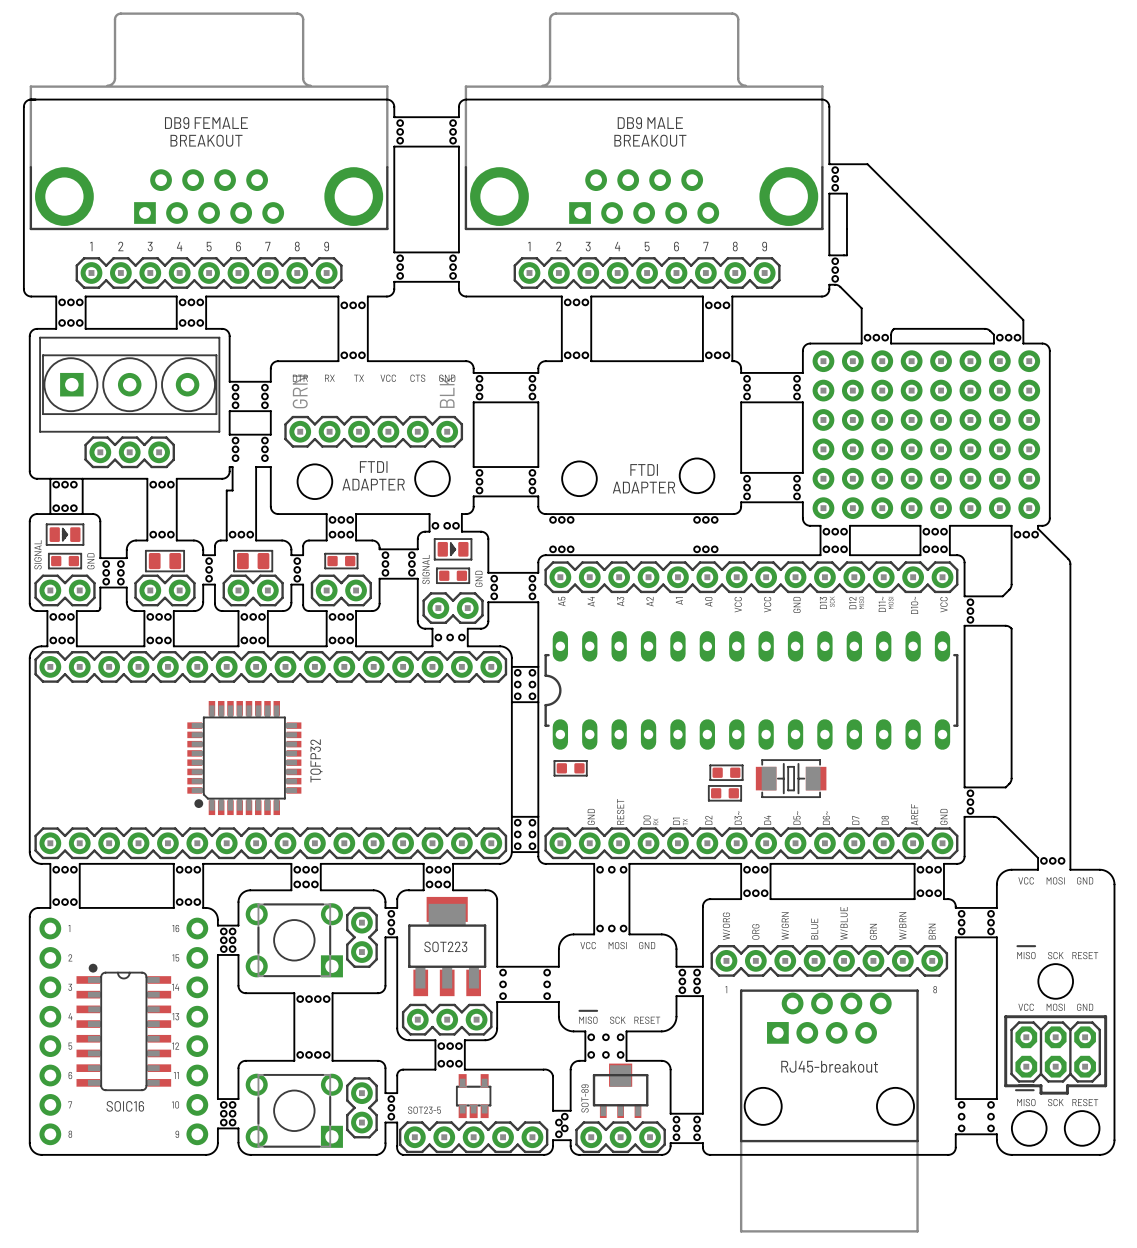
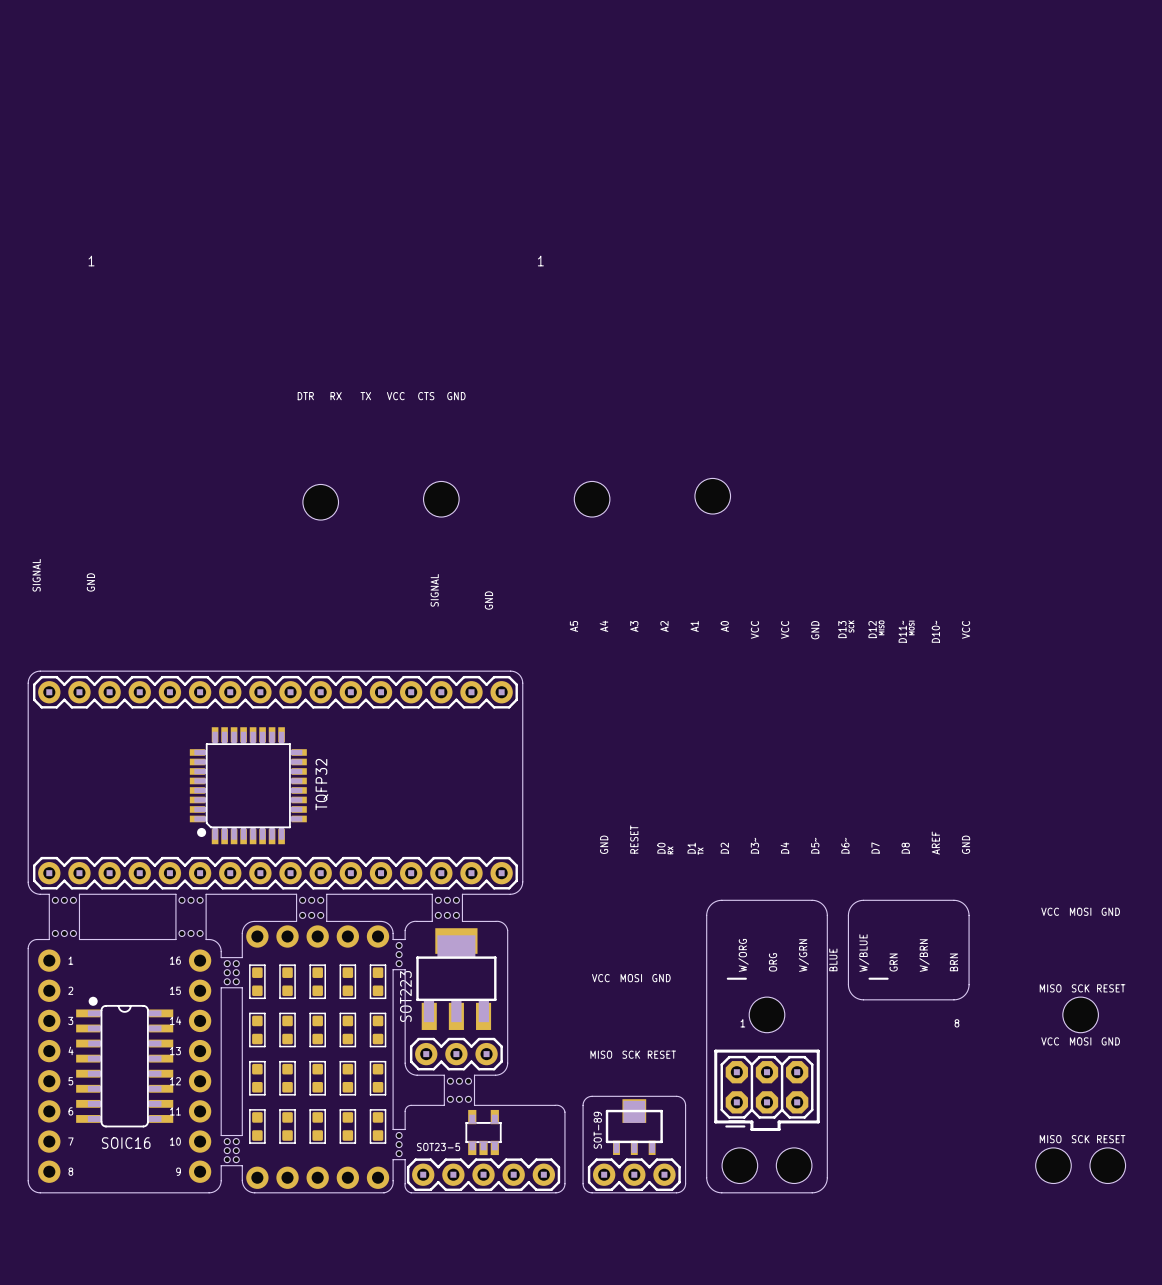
board edge: (29, 99) (386, 99) (393, 104) (394, 117) (458, 117) (459, 104) (466, 99) (823, 99) (829, 105) (829, 164) (867, 164) (1023, 320) (1023, 343) (1043, 343) (1048, 346) (1049, 518) (1046, 524) (1038, 525) (1038, 528) (1070, 563) (1070, 869) (1103, 870) (1111, 875) (1114, 882) (1113, 1143) (1108, 1151) (1101, 1154) (1011, 1154) (999, 1149) (996, 1134) (955, 1134) (955, 1149) (949, 1154) (794, 1154) -> (726, 1192) (712, 1189) (708, 1185) (706, 1177) (706, 915) (711, 904) (721, 900) (814, 900) (821, 903) (826, 911) (827, 1177) (822, 1188) (812, 1192)
board edge: (31, 99) (26, 101) (23, 106) (23, 290) (26, 294) (30, 296) (56, 296) (56, 328) (35, 329) (29, 335) (30, 473) (32, 477) (37, 478) (147, 478) (147, 540) (130, 542) (127, 547) (126, 558) (100, 558) (100, 520) (95, 514) (37, 514) (30, 517) (29, 604) (34, 610) (47, 611) (47, 646) -> none
part: (209, 121) -> none
part: (644, 121) -> none
text: DB9 FEMALE (206, 123) -> none
hole: (400, 123) -> none
hole: (453, 123) -> none
text: DB9 MALE (650, 123) -> none
hole: (400, 131) -> none
hole: (453, 131) -> none
text: BREAKOUT (206, 140) -> none
hole: (400, 140) -> none
hole: (453, 140) -> none
text: BREAKOUT (650, 140) -> none
board edge: (394, 146) (394, 252) (458, 252) (458, 146) (394, 146) -> none
hole: (835, 170) -> none
hole: (835, 178) -> none
hole: (835, 187) -> none
board edge: (829, 193) (829, 255) (846, 255) (846, 193) (829, 193) -> none
text: 2 (120, 246) -> none
text: 3 (150, 246) -> none
text: 4 (179, 246) -> none
text: 5 (209, 246) -> none
text: 6 (238, 246) -> none
text: 7 (267, 246) -> none
text: 8 (297, 246) -> none
text: 9 (326, 246) -> none
text: 2 (558, 246) -> none
text: 3 (588, 246) -> none
text: 4 (617, 246) -> none
text: 5 (647, 246) -> none
text: 6 (676, 246) -> none
text: 7 (705, 246) -> none
text: 8 (735, 246) -> none
text: 9 (764, 246) -> none
hole: (400, 258) -> none
hole: (453, 258) -> none
hole: (835, 261) -> none
hole: (400, 267) -> none
hole: (453, 267) -> none
hole: (835, 270) -> none
part: (209, 272) -> none
part: (647, 272) -> none
hole: (400, 275) -> none
hole: (453, 275) -> none
hole: (835, 278) -> none
board edge: (394, 281) (394, 291) (390, 295) (367, 296) (367, 361) (467, 361) (472, 364) (473, 372) (538, 372) (538, 365) (541, 362) (561, 361) (561, 296) (465, 296) (459, 291) (458, 281) (394, 281) -> none
board edge: (829, 284) (828, 292) (822, 296) (732, 296) (732, 361) (739, 364) (741, 372) (802, 372) (802, 349) (806, 344) (861, 343) (861, 308) (839, 286) (829, 284) -> none
board edge: (85, 296) (176, 296) (176, 328) (85, 328) (85, 296) -> none
board edge: (206, 296) (338, 296) (338, 361) (277, 361) (271, 366) (270, 381) (229, 381) (229, 334) (224, 329) (206, 328) (206, 296) -> none
board edge: (591, 296) (702, 296) (702, 361) (591, 361) (591, 296) -> none
hole: (62, 302) -> none
hole: (70, 302) -> none
hole: (79, 302) -> none
hole: (182, 302) -> none
hole: (191, 302) -> none
hole: (200, 302) -> none
hole: (567, 302) -> none
hole: (576, 302) -> none
hole: (585, 302) -> none
hole: (344, 305) -> none
hole: (353, 305) -> none
hole: (361, 305) -> none
hole: (708, 305) -> none
hole: (717, 305) -> none
hole: (726, 305) -> none
hole: (62, 322) -> none
hole: (70, 322) -> none
hole: (79, 322) -> none
hole: (182, 322) -> none
hole: (191, 322) -> none
hole: (200, 322) -> none
board edge: (894, 328) (985, 328) (993, 334) (993, 343) (891, 343) (891, 332) (894, 328) -> none
hole: (867, 337) -> none
hole: (876, 337) -> none
hole: (885, 337) -> none
hole: (999, 337) -> none
hole: (1008, 337) -> none
hole: (1017, 337) -> none
hole: (344, 355) -> none
hole: (353, 355) -> none
hole: (361, 355) -> none
hole: (567, 355) -> none
hole: (576, 355) -> none
hole: (585, 355) -> none
hole: (708, 355) -> none
hole: (717, 355) -> none
hole: (726, 355) -> none
part: (926, 361) -> none
hole: (479, 378) -> none
hole: (532, 378) -> none
hole: (747, 378) -> none
hole: (797, 378) -> none
part: (129, 384) -> none
hole: (235, 387) -> none
hole: (264, 387) -> none
hole: (479, 387) -> none
hole: (532, 387) -> none
hole: (747, 387) -> none
hole: (797, 387) -> none
part: (926, 390) -> none
hole: (235, 396) -> none
hole: (264, 396) -> none
hole: (479, 396) -> none
hole: (532, 396) -> none
hole: (747, 396) -> none
hole: (797, 396) -> none
board edge: (473, 402) (473, 467) (538, 467) (538, 402) (473, 402) -> none
board edge: (741, 402) (741, 472) (802, 472) (802, 402) (741, 402) -> none
hole: (235, 405) -> none
hole: (264, 405) -> none
board edge: (229, 411) (229, 434) (270, 434) (270, 411) (229, 411) -> none
part: (926, 419) -> none
part: (373, 431) -> none
hole: (235, 440) -> none
hole: (264, 440) -> none
hole: (235, 449) -> none
hole: (264, 449) -> none
part: (926, 449) -> none
part: (129, 452) -> none
hole: (235, 458) -> none
hole: (264, 458) -> none
board edge: (229, 467) (229, 474) (224, 478) (176, 478) (176, 540) (198, 541) (202, 546) (203, 555) (214, 555) (216, 542) (226, 540) (226, 490) (232, 490) (232, 467) (229, 467) -> none
board edge: (256, 467) (270, 467) (270, 506) (272, 511) (278, 514) (326, 514) (326, 540) (306, 541) (303, 544) (303, 555) (291, 555) (290, 546) (284, 540) (256, 540) (256, 467) -> none
text: FTDI (373, 467) -> none
text: FTDI (644, 469) -> none
hole: (479, 472) -> none
hole: (532, 472) -> none
board edge: (50, 478) (50, 514) -> none
board edge: (82, 478) (82, 514) -> none
hole: (747, 478) -> none
hole: (797, 478) -> none
part: (926, 478) -> none
hole: (479, 481) -> none
hole: (532, 481) -> none
hole: (56, 484) -> none
hole: (65, 484) -> none
hole: (73, 484) -> none
hole: (153, 484) -> none
hole: (162, 484) -> none
hole: (170, 484) -> none
text: ADAPTER (373, 484) -> none
text: ADAPTER (644, 487) -> none
hole: (747, 487) -> none
hole: (797, 487) -> none
hole: (479, 490) -> none
hole: (532, 490) -> none
board edge: (473, 496) (472, 510) (469, 513) (461, 514) (461, 531) (481, 531) (487, 535) (488, 572) (538, 572) (538, 559) (545, 555) (820, 555) (820, 525) (809, 525) (804, 522) (802, 502) (741, 502) (740, 510) (733, 514) (545, 514) (538, 509) (538, 496) (473, 496) -> none
hole: (747, 496) -> none
hole: (797, 496) -> none
hole: (56, 508) -> none
hole: (65, 508) -> none
hole: (73, 508) -> none
part: (926, 508) -> none
board edge: (356, 514) (429, 514) (429, 531) (422, 532) (418, 535) (417, 549) (379, 549) (378, 544) (375, 541) (356, 540) (356, 514) -> none
hole: (332, 519) -> none
hole: (341, 519) -> none
hole: (350, 519) -> none
hole: (553, 519) -> none
hole: (561, 519) -> none
hole: (570, 519) -> none
hole: (697, 519) -> none
hole: (705, 519) -> none
hole: (714, 519) -> none
hole: (435, 525) -> none
hole: (447, 525) -> none
hole: (456, 525) -> none
board edge: (849, 525) (920, 525) (920, 555) (849, 555) (849, 525) -> none
board edge: (949, 525) (1011, 525) (1011, 585) (1002, 596) (964, 596) (964, 560) (960, 555) (949, 555) (949, 525) -> none
hole: (826, 531) -> none
hole: (835, 531) -> none
hole: (844, 531) -> none
hole: (926, 531) -> none
hole: (935, 531) -> none
hole: (943, 531) -> none
part: (65, 534) -> none
hole: (153, 534) -> none
hole: (162, 534) -> none
hole: (170, 534) -> none
hole: (232, 534) -> none
hole: (241, 534) -> none
hole: (250, 534) -> none
hole: (332, 534) -> none
hole: (341, 534) -> none
hole: (350, 534) -> none
hole: (1017, 534) -> none
hole: (1026, 534) -> none
hole: (1035, 534) -> none
part: (453, 549) -> none
hole: (553, 549) -> none
hole: (561, 549) -> none
hole: (570, 549) -> none
hole: (697, 549) -> none
hole: (705, 549) -> none
hole: (714, 549) -> none
hole: (826, 549) -> none
hole: (835, 549) -> none
hole: (844, 549) -> none
hole: (926, 549) -> none
hole: (935, 549) -> none
hole: (943, 549) -> none
hole: (385, 555) -> none
hole: (411, 555) -> none
part: (65, 561) -> none
part: (164, 561) -> none
hole: (209, 561) -> none
part: (253, 561) -> none
hole: (297, 561) -> none
part: (341, 561) -> none
hole: (106, 564) -> none
hole: (120, 564) -> none
hole: (385, 564) -> none
hole: (411, 564) -> none
hole: (209, 569) -> none
hole: (297, 569) -> none
hole: (106, 572) -> none
hole: (120, 572) -> none
hole: (385, 572) -> none
hole: (411, 572) -> none
part: (453, 575) -> none
part: (751, 577) -> none
hole: (209, 578) -> none
hole: (297, 578) -> none
hole: (494, 578) -> none
hole: (532, 578) -> none
hole: (106, 581) -> none
hole: (120, 581) -> none
hole: (494, 587) -> none
hole: (532, 587) -> none
part: (65, 590) -> none
part: (164, 590) -> none
part: (253, 590) -> none
part: (341, 590) -> none
hole: (494, 596) -> none
hole: (532, 596) -> none
hole: (970, 602) -> none
part: (453, 608) -> none
hole: (970, 611) -> none
hole: (53, 616) -> none
hole: (62, 616) -> none
hole: (70, 616) -> none
hole: (150, 616) -> none
hole: (159, 616) -> none
hole: (167, 616) -> none
hole: (244, 616) -> none
hole: (253, 616) -> none
hole: (261, 616) -> none
hole: (332, 616) -> none
hole: (341, 616) -> none
hole: (350, 616) -> none
hole: (970, 619) -> none
board edge: (964, 625) (964, 787) (1005, 787) (1011, 778) (1011, 628) (1005, 625) (964, 625) -> none
hole: (438, 637) -> none
hole: (450, 637) -> none
hole: (461, 637) -> none
hole: (53, 640) -> none
hole: (62, 640) -> none
hole: (70, 640) -> none
hole: (150, 640) -> none
hole: (159, 640) -> none
hole: (167, 640) -> none
hole: (244, 640) -> none
hole: (253, 640) -> none
hole: (261, 640) -> none
hole: (332, 640) -> none
hole: (341, 640) -> none
hole: (350, 640) -> none
board edge: (76, 646) (76, 611) (99, 610) (100, 587) (126, 587) (128, 607) (133, 610) (144, 611) (144, 646) -> (76, 671) (46, 671)
board edge: (173, 646) (173, 611) (195, 610) (200, 608) (203, 603) (203, 584) (214, 584) (215, 604) (217, 609) (238, 611) (238, 646) -> (175, 671) (145, 671)
board edge: (267, 646) (267, 611) (284, 610) (288, 608) (291, 603) (291, 584) (303, 584) (303, 605) (305, 609) (326, 611) (326, 646) -> (272, 671) (242, 671)
board edge: (356, 646) (356, 611) (373, 610) (378, 608) (379, 578) (417, 578) (418, 623) (422, 628) (432, 628) (432, 646) -> (362, 671) (332, 671)
board edge: (467, 646) (467, 628) (482, 628) (487, 624) (488, 602) (538, 602) (538, 858) (544, 863) (594, 863) (594, 934) (571, 934) (563, 938) (559, 947) (558, 966) (497, 966) -> (477, 671) (441, 671)
board edge: (511, 666) (538, 666) -> none
hole: (517, 672) -> none
hole: (532, 672) -> none
hole: (517, 684) -> none
hole: (532, 684) -> none
part: (751, 690) -> none
hole: (517, 696) -> none
hole: (532, 696) -> none
board edge: (511, 702) (538, 702) -> none
part: (570, 768) -> none
part: (726, 772) -> none
part: (791, 778) -> none
part: (724, 793) -> none
hole: (970, 793) -> none
hole: (970, 802) -> none
hole: (970, 810) -> none
board edge: (511, 816) (538, 816) -> none
board edge: (964, 816) (964, 858) (959, 863) (943, 863) (943, 899) (952, 900) (955, 907) (996, 907) (997, 882) (999, 875) (1009, 869) (1038, 869) (1038, 857) (997, 817) (964, 816) -> none
hole: (517, 822) -> none
hole: (532, 822) -> none
hole: (517, 834) -> none
hole: (532, 834) -> none
part: (751, 843) -> none
hole: (517, 846) -> none
hole: (532, 846) -> none
board edge: (511, 852) (538, 852) -> none
hole: (1043, 860) -> none
hole: (1052, 860) -> none
hole: (1061, 860) -> none
board edge: (629, 863) (741, 863) (741, 899) (709, 899) (703, 903) (702, 966) (676, 966) (675, 945) (667, 935) (629, 934) (629, 863) -> none
board edge: (770, 863) (914, 863) (914, 899) (770, 899) (770, 863) -> none
hole: (600, 869) -> none
hole: (611, 869) -> none
hole: (623, 869) -> none
hole: (747, 869) -> none
hole: (755, 869) -> none
hole: (764, 869) -> none
board edge: none -> (863, 900) (953, 900) (964, 904) (969, 915) (969, 984) (964, 995) (953, 999) (863, 999) (852, 995) (848, 984) (848, 913) (854, 903) (863, 900)
hole: (920, 869) -> none
hole: (929, 869) -> none
hole: (938, 869) -> none
hole: (747, 893) -> none
hole: (755, 893) -> none
hole: (764, 893) -> none
hole: (920, 893) -> none
hole: (929, 893) -> none
hole: (938, 893) -> none
part: none -> (257, 936)
part: none -> (287, 936)
part: none -> (317, 936)
part: none -> (347, 936)
part: none -> (378, 936)
hole: (961, 913) -> none
hole: (991, 913) -> none
hole: (961, 922) -> none
hole: (991, 922) -> none
hole: (600, 928) -> none
hole: (611, 928) -> none
hole: (623, 928) -> none
hole: (961, 931) -> none
hole: (991, 931) -> none
part: (361, 937) -> none
board edge: (955, 937) (996, 937) (996, 1099) (955, 1099) (955, 937) -> none
part: (294, 940) -> none
SOT223 name rotation: 0° (445, 946) -> 90° counterclockwise (405, 996)
line: (1017, 946) (1035, 946) -> (869, 978) (887, 978)
part: none -> (257, 981)
part: none -> (287, 981)
part: none -> (317, 981)
part: none -> (347, 981)
part: none -> (378, 981)
part: (829, 960) -> none
hole: (503, 972) -> none
hole: (547, 972) -> none
hole: (682, 972) -> none
hole: (697, 972) -> none
hole: (682, 981) -> none
hole: (697, 981) -> none
hole: none -> (767, 1014)
hole: (503, 984) -> none
hole: (547, 984) -> none
board edge: (238, 985) (239, 990) (244, 993) (294, 993) (294, 1060) (244, 1060) (239, 1063) (238, 1068) -> (242, 1019) (242, 1103)
board edge: (385, 985) (383, 990) (379, 993) (332, 993) (332, 1060) (379, 1060) (383, 1063) (385, 1068) -> (393, 1019) (393, 1103)
hole: (682, 990) -> none
hole: (697, 990) -> none
part: none -> (257, 1029)
part: none -> (287, 1029)
part: none -> (317, 1029)
part: none -> (347, 1029)
part: none -> (378, 1029)
hole: (503, 996) -> none
hole: (547, 996) -> none
hole: (300, 999) -> none
hole: (309, 999) -> none
hole: (317, 999) -> none
hole: (326, 999) -> none
board edge: (497, 1002) (558, 1002) (559, 1018) (563, 1027) (571, 1031) (585, 1031) (585, 1060) -> (507, 1036) (507, 999)
line: (579, 1010) (597, 1010) -> (727, 978) (745, 978)
line: none -> (715, 1051) (715, 1121) (751, 1121) (751, 1129) (779, 1129) (779, 1121) (818, 1121) (818, 1051) (715, 1051)
line: (1005, 1016) (1005, 1085) (1040, 1085) (1040, 1093) (1067, 1093) (1067, 1085) (1105, 1085) (1105, 1016) (1005, 1016) -> none
hole: (591, 1037) -> none
hole: (605, 1037) -> none
hole: (620, 1037) -> none
part: none -> (257, 1078)
part: none -> (287, 1078)
part: none -> (317, 1078)
part: none -> (347, 1078)
part: none -> (378, 1078)
part: none -> (767, 1089)
part: (1055, 1053) -> none
hole: (300, 1054) -> none
hole: (309, 1054) -> none
hole: (317, 1054) -> none
hole: (326, 1054) -> none
hole: (591, 1054) -> none
hole: (605, 1054) -> none
hole: (620, 1054) -> none
board edge: (626, 1060) (626, 1031) (667, 1030) (675, 1020) (676, 996) (702, 996) (702, 1113) (670, 1113) -> (640, 1096) (598, 1096)
text: RJ45-breakout (829, 1066) -> none
part: none -> (257, 1126)
part: none -> (287, 1126)
part: none -> (317, 1126)
part: none -> (347, 1126)
part: none -> (378, 1126)
line: none -> (726, 1126) (744, 1126)
line: (1016, 1090) (1033, 1090) -> none
hole: (961, 1104) -> none
hole: (991, 1104) -> none
part: (361, 1107) -> none
part: (294, 1110) -> none
board edge: (553, 1110) (570, 1110) -> (564, 1147) (564, 1177)
part: (829, 1111) -> none
hole: (564, 1116) -> none
hole: (961, 1116) -> none
hole: (991, 1116) -> none
hole: (676, 1119) -> none
hole: (697, 1119) -> none
hole: (558, 1122) -> none
hole: (564, 1128) -> none
hole: (676, 1128) -> none
hole: (697, 1128) -> none
hole: none -> (739, 1165)
hole: none -> (794, 1165)
hole: (961, 1128) -> none
hole: (991, 1128) -> none
hole: (558, 1134) -> none
hole: (676, 1137) -> none
hole: (697, 1137) -> none
part: none -> (257, 1177)
part: none -> (287, 1177)
part: none -> (317, 1177)
part: none -> (347, 1177)
part: none -> (378, 1177)
board edge: (553, 1140) (570, 1140) -> (583, 1147) (583, 1177)
board edge: (670, 1143) (702, 1143) (703, 1151) (710, 1154) -> (685, 1180) (685, 1150)

